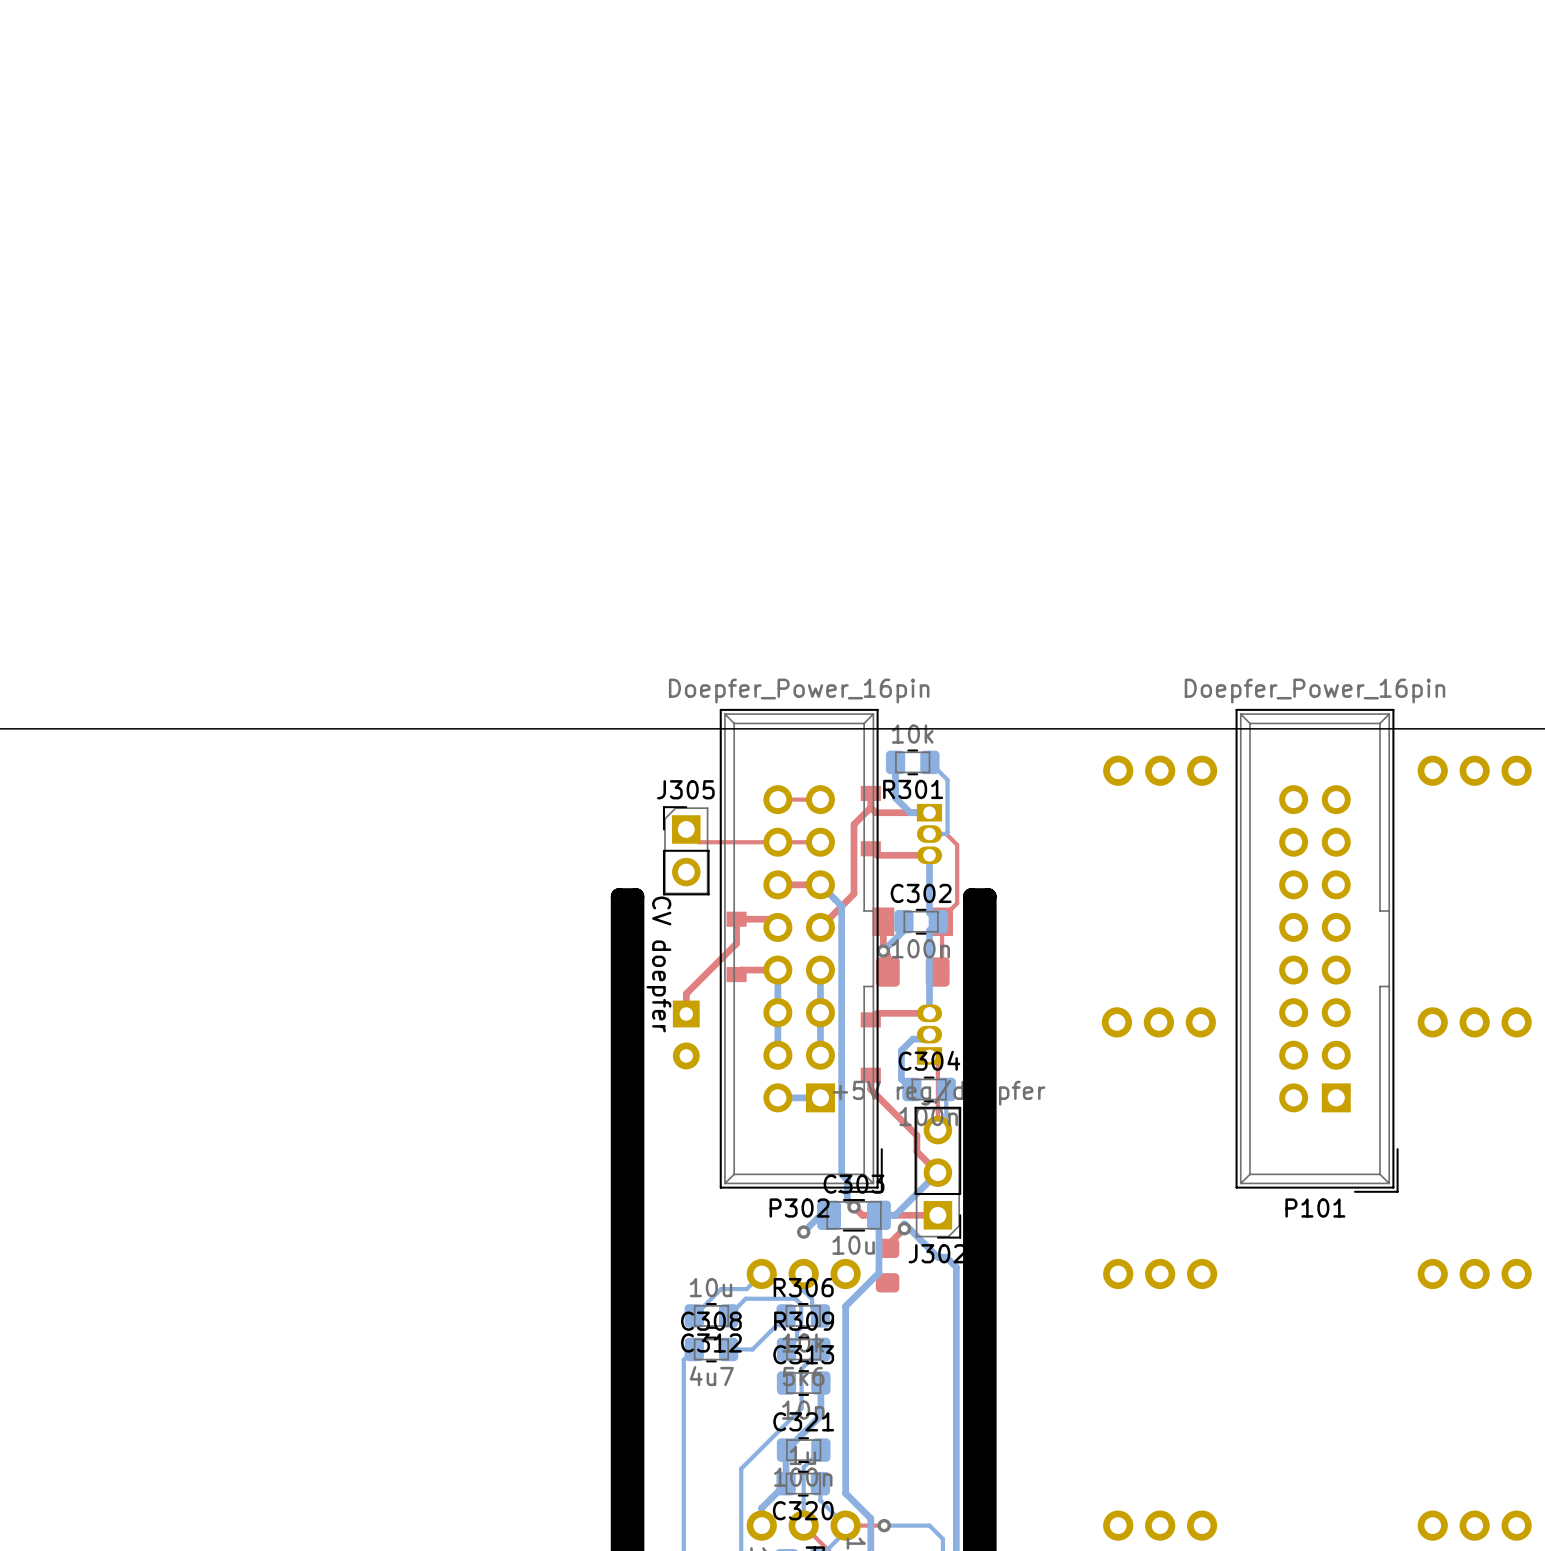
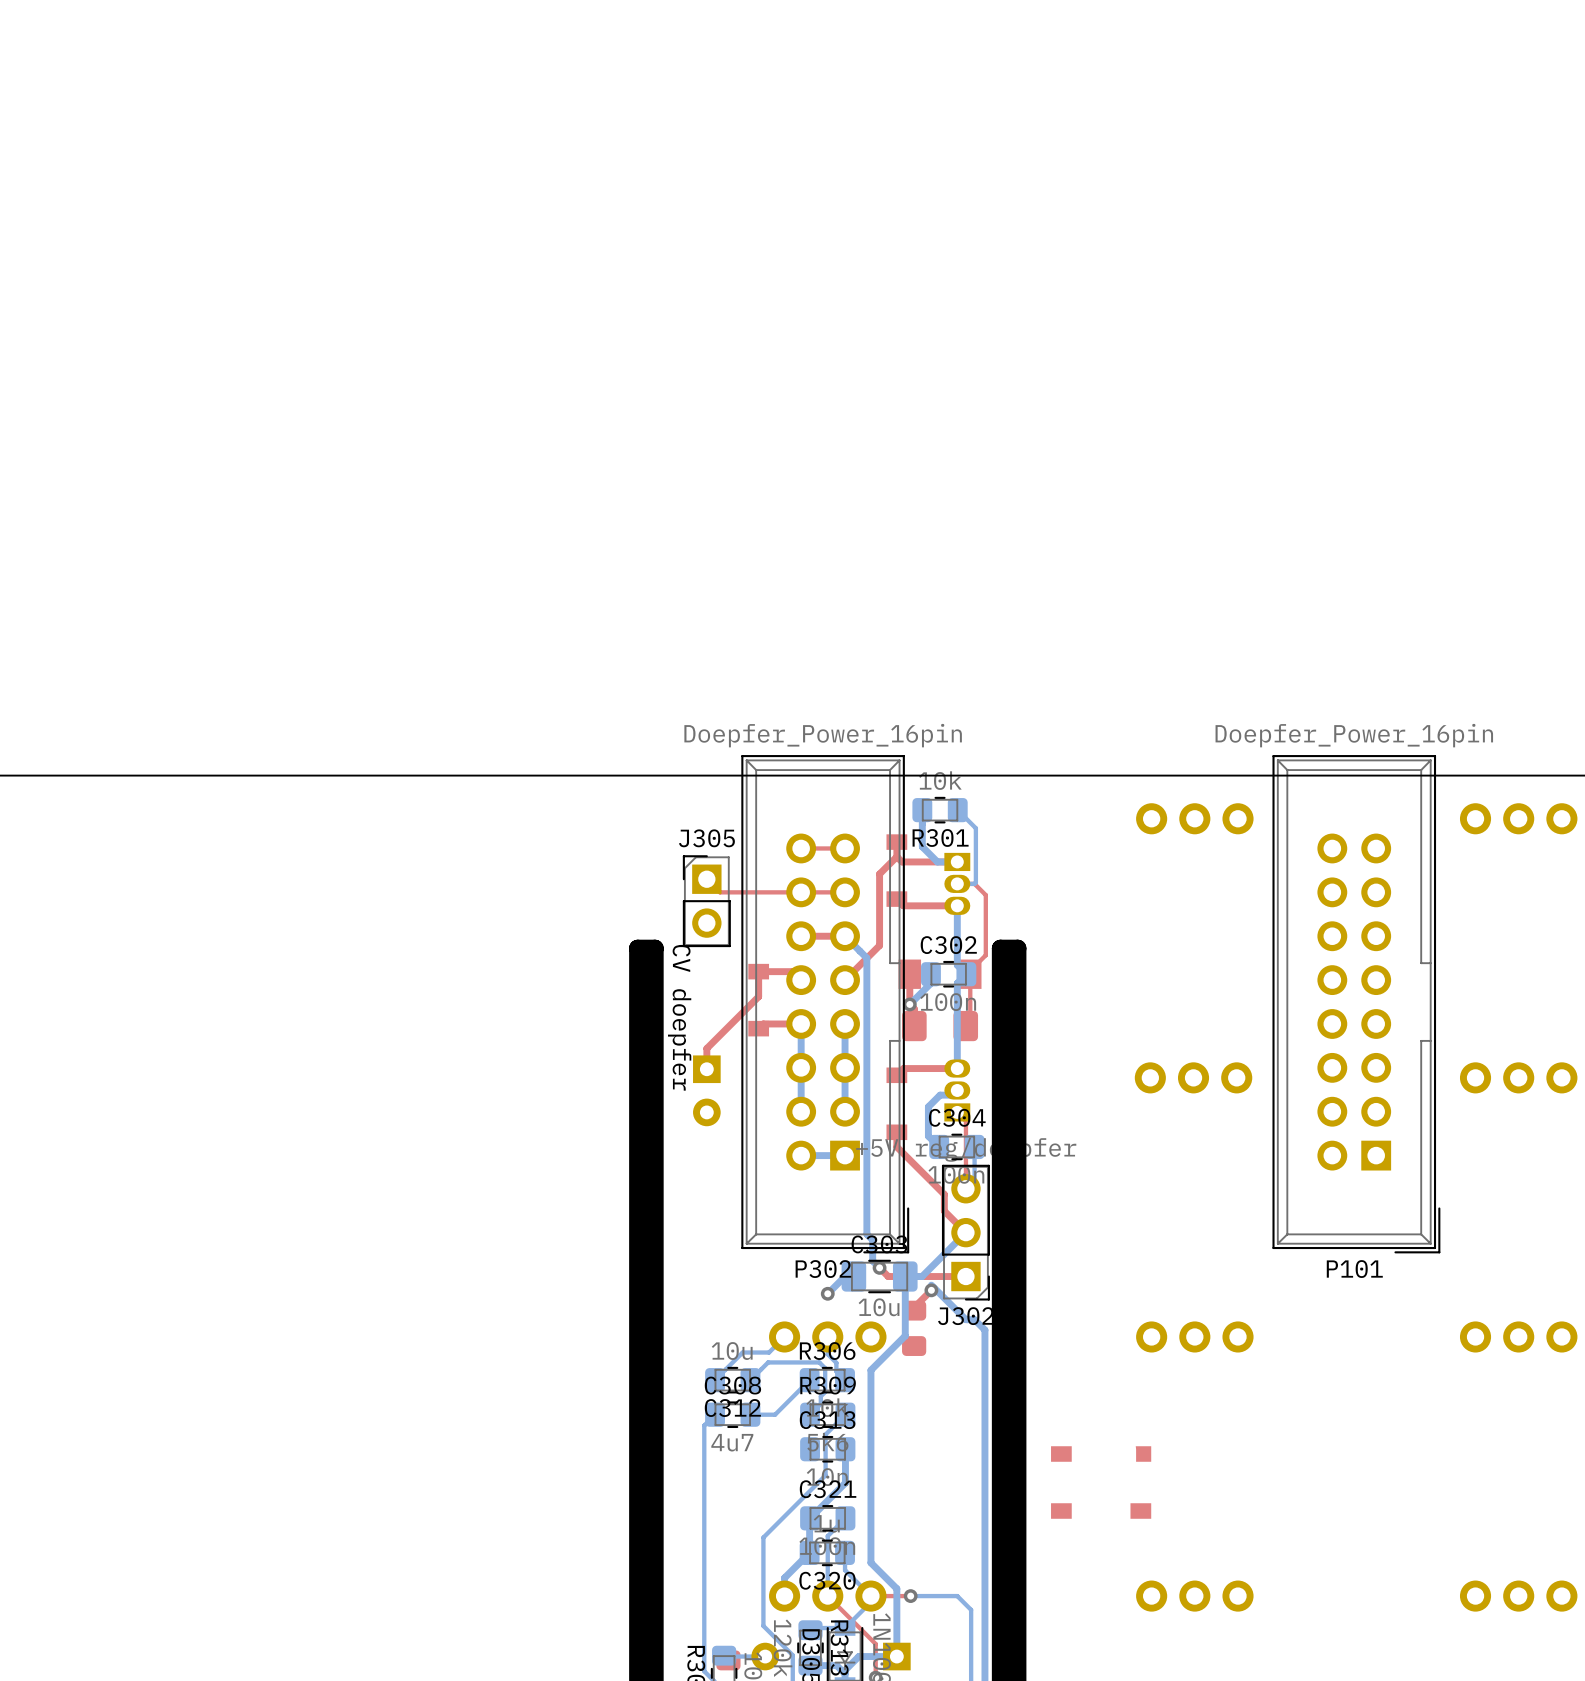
part: none -> (1061, 1482)
part: none -> (1140, 1482)

